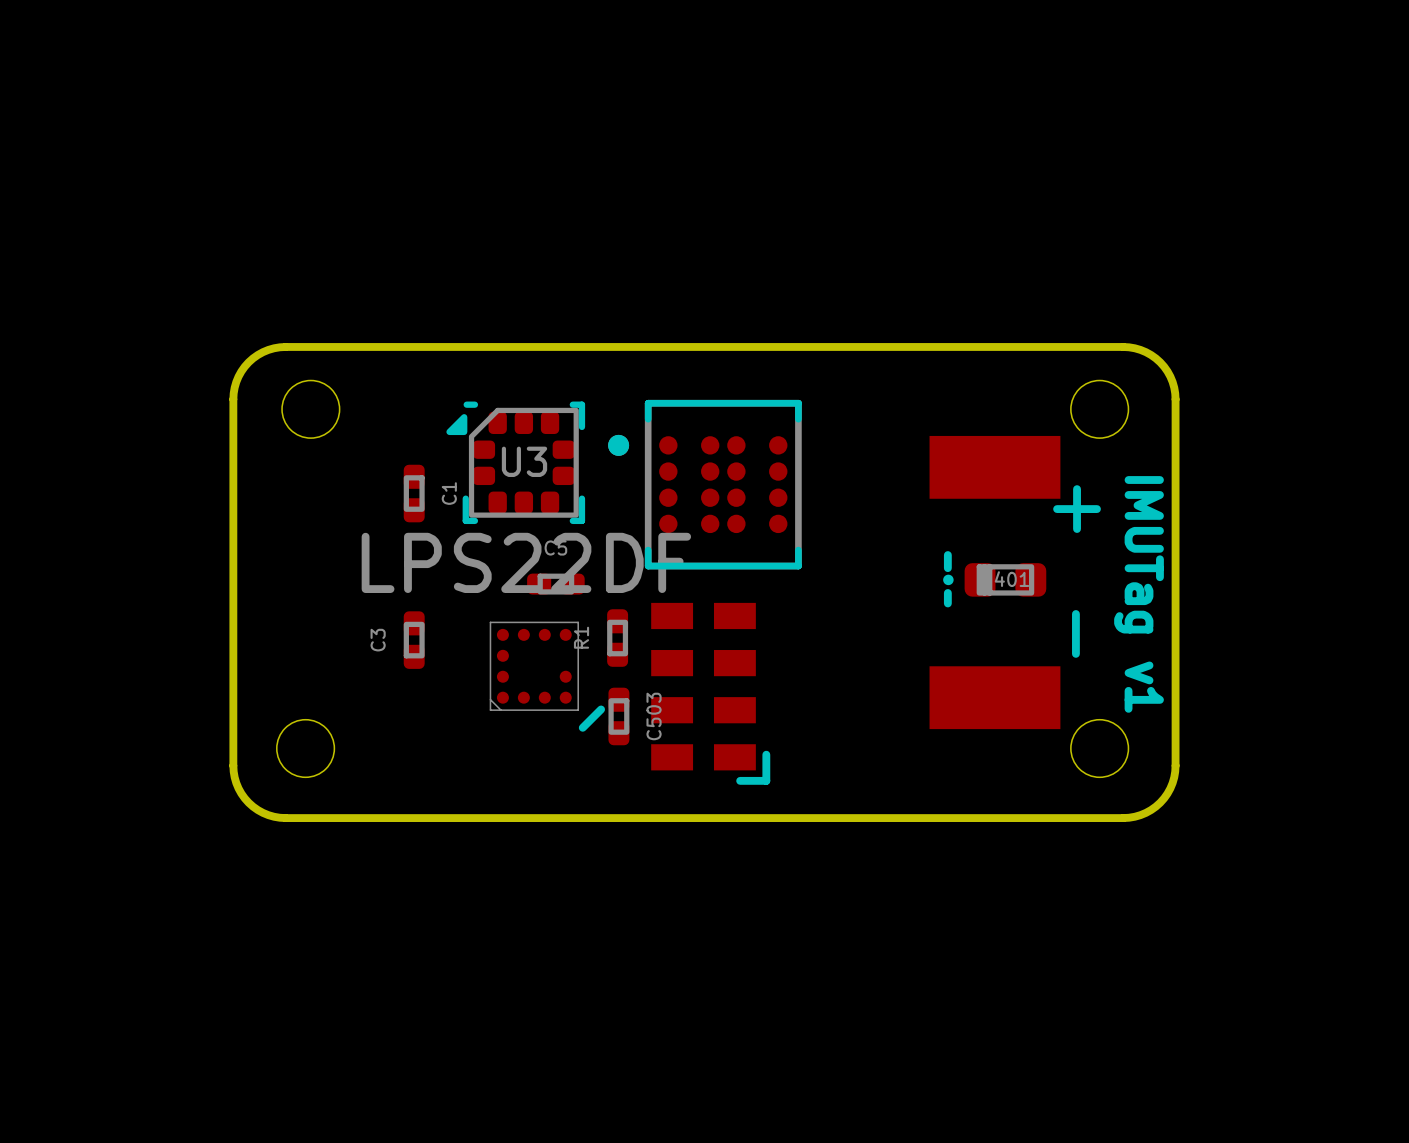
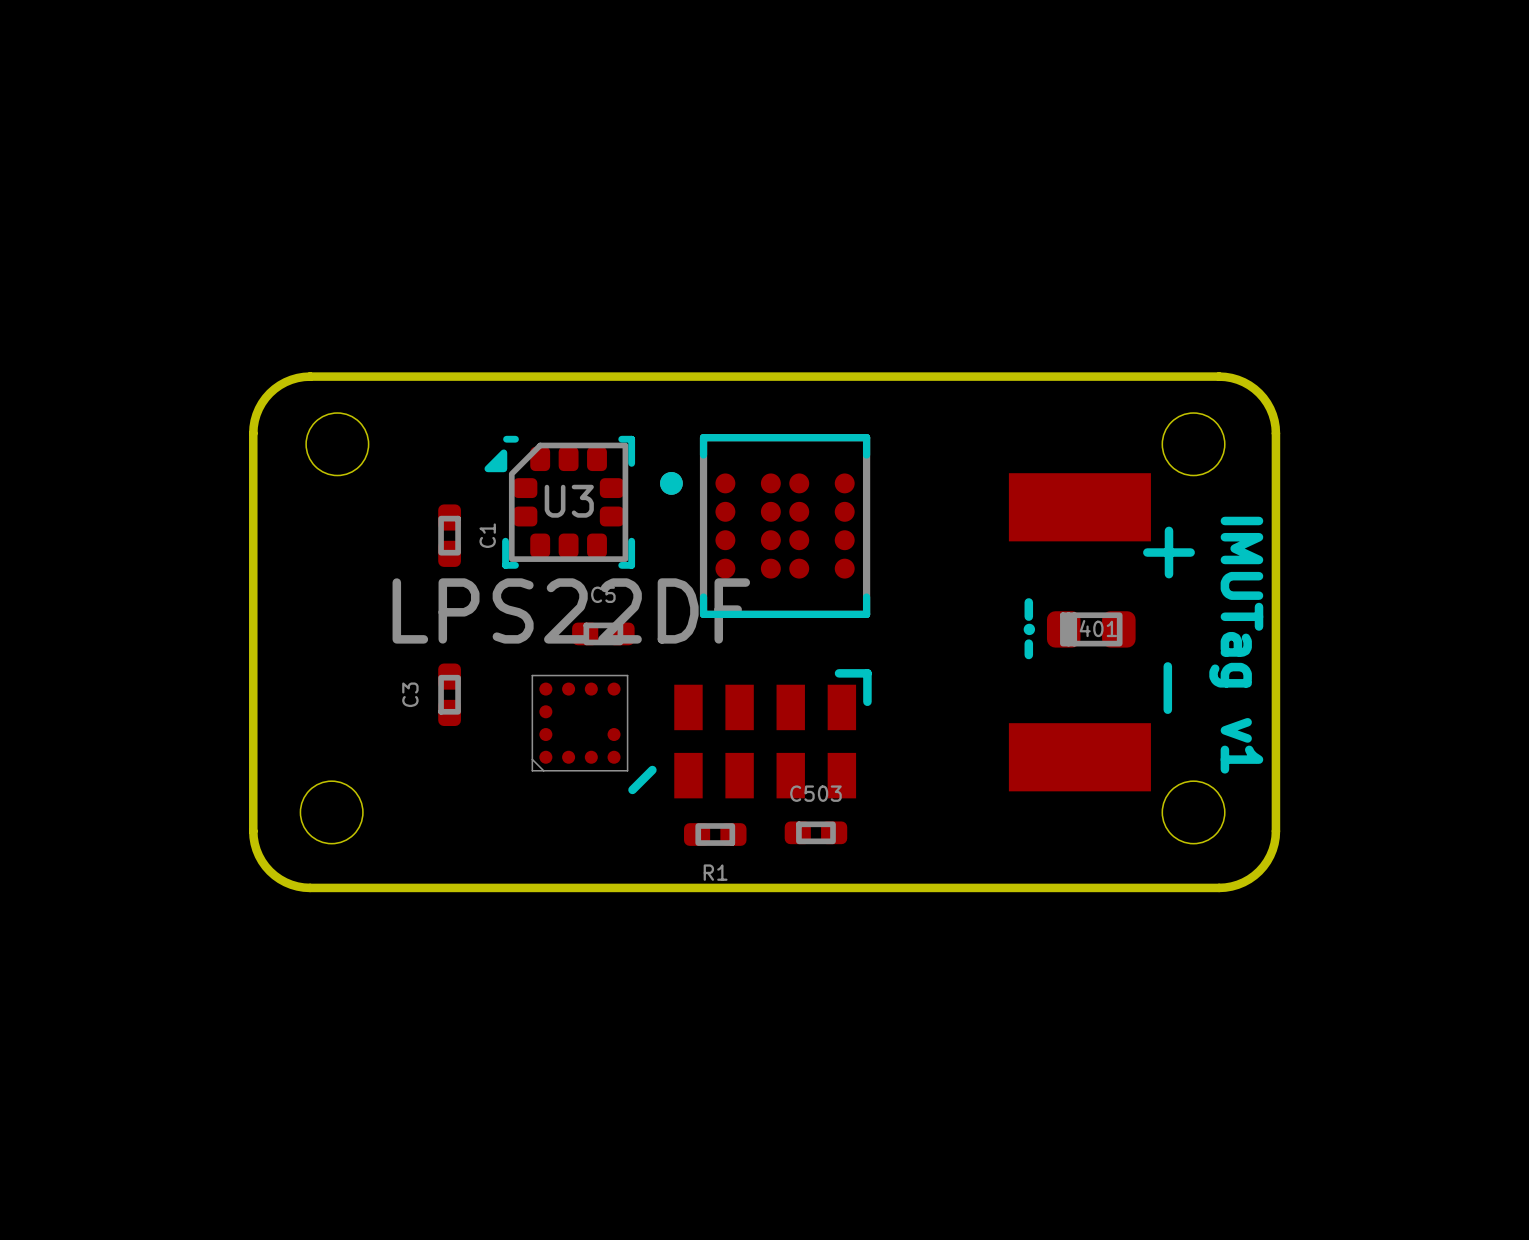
R1 rotation: 0° (617, 638) -> 90° clockwise (715, 834)
R1 position: (617, 638) -> (715, 834)
part rotation: 0° (710, 693) -> 90° counterclockwise (772, 733)
C503 rotation: 0° (618, 716) -> 90° clockwise (815, 832)
C503 position: (618, 716) -> (815, 832)

